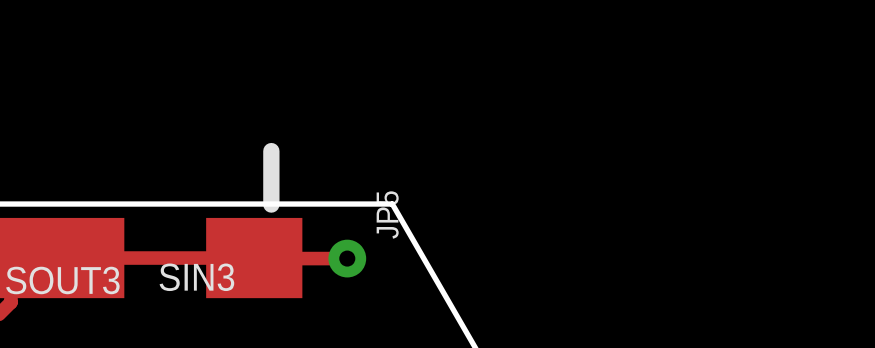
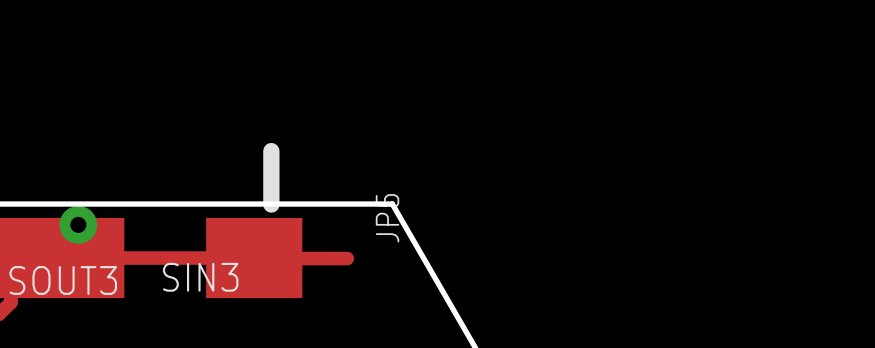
via: none -> (78, 224)
via: (347, 258) -> none

